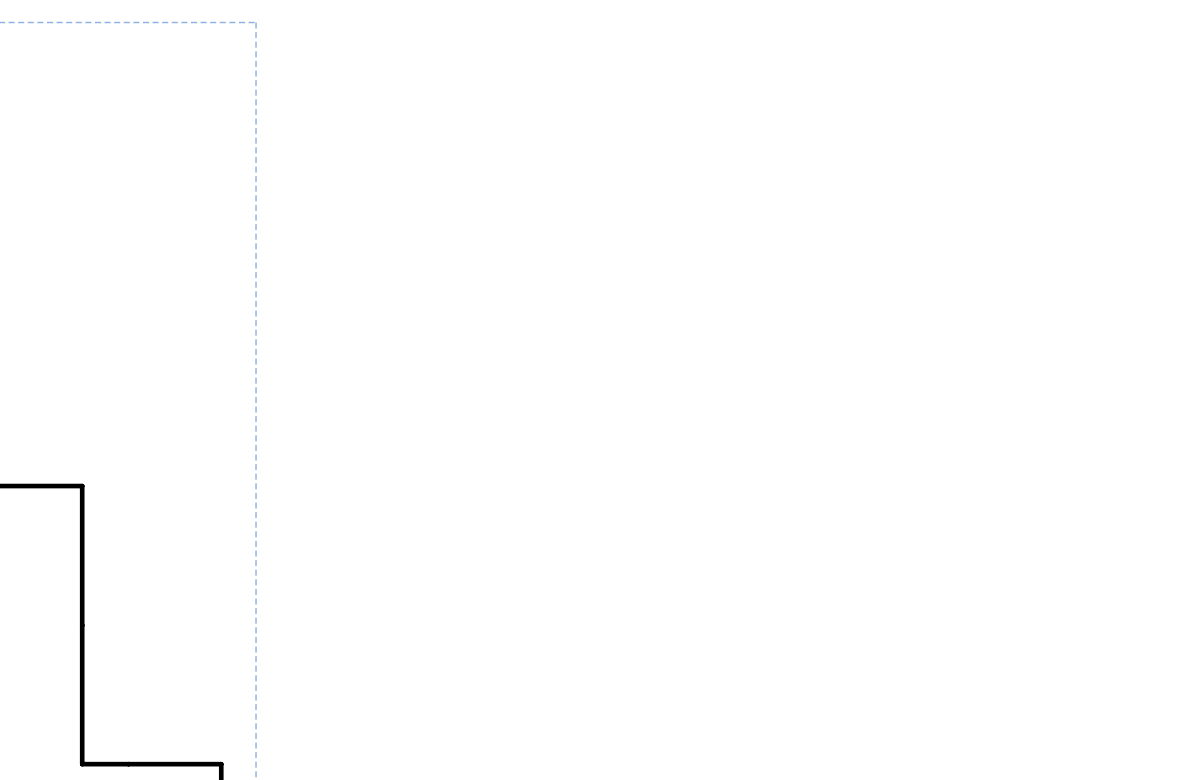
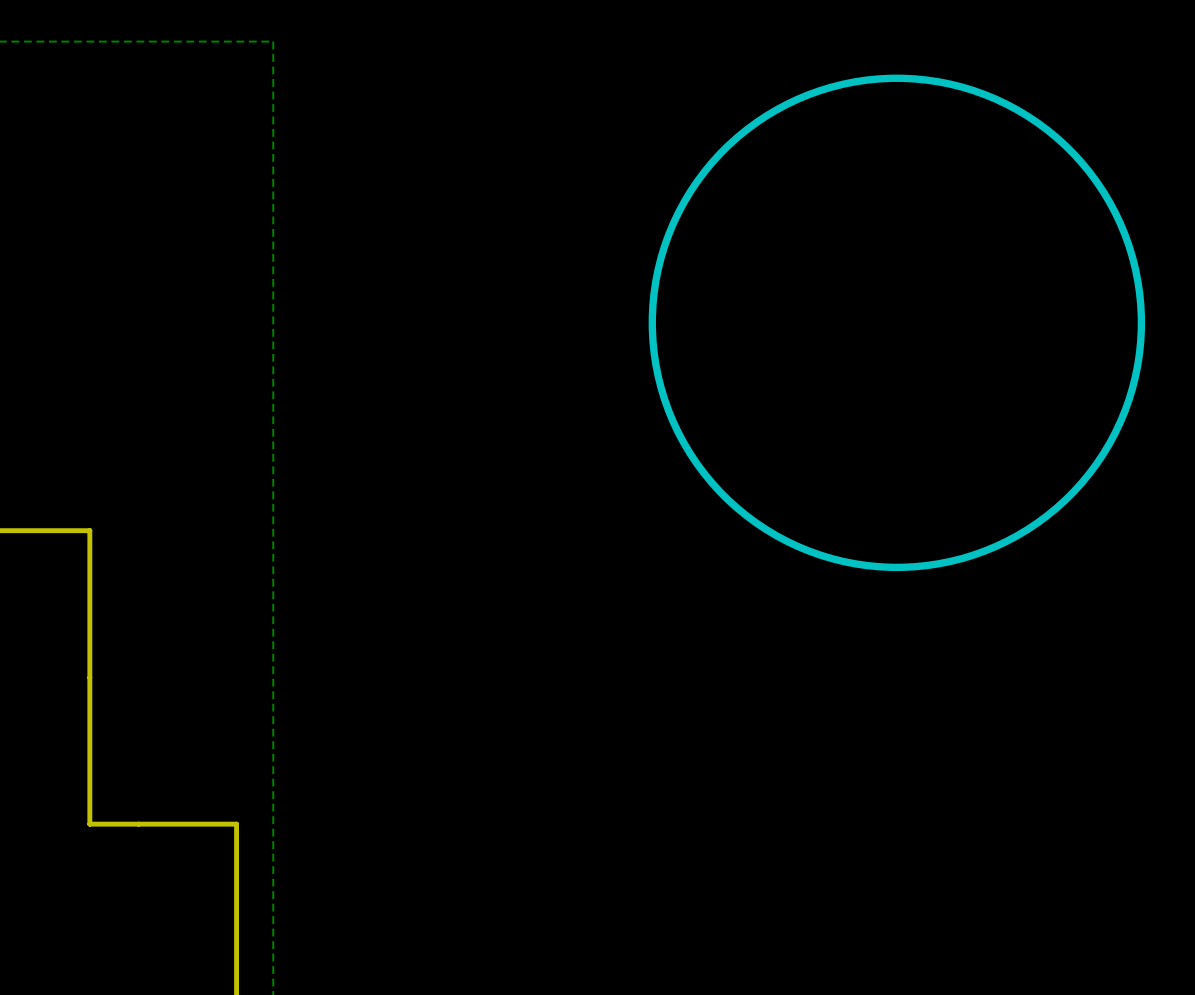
drawing: none -> [648, 74, 1146, 572]

